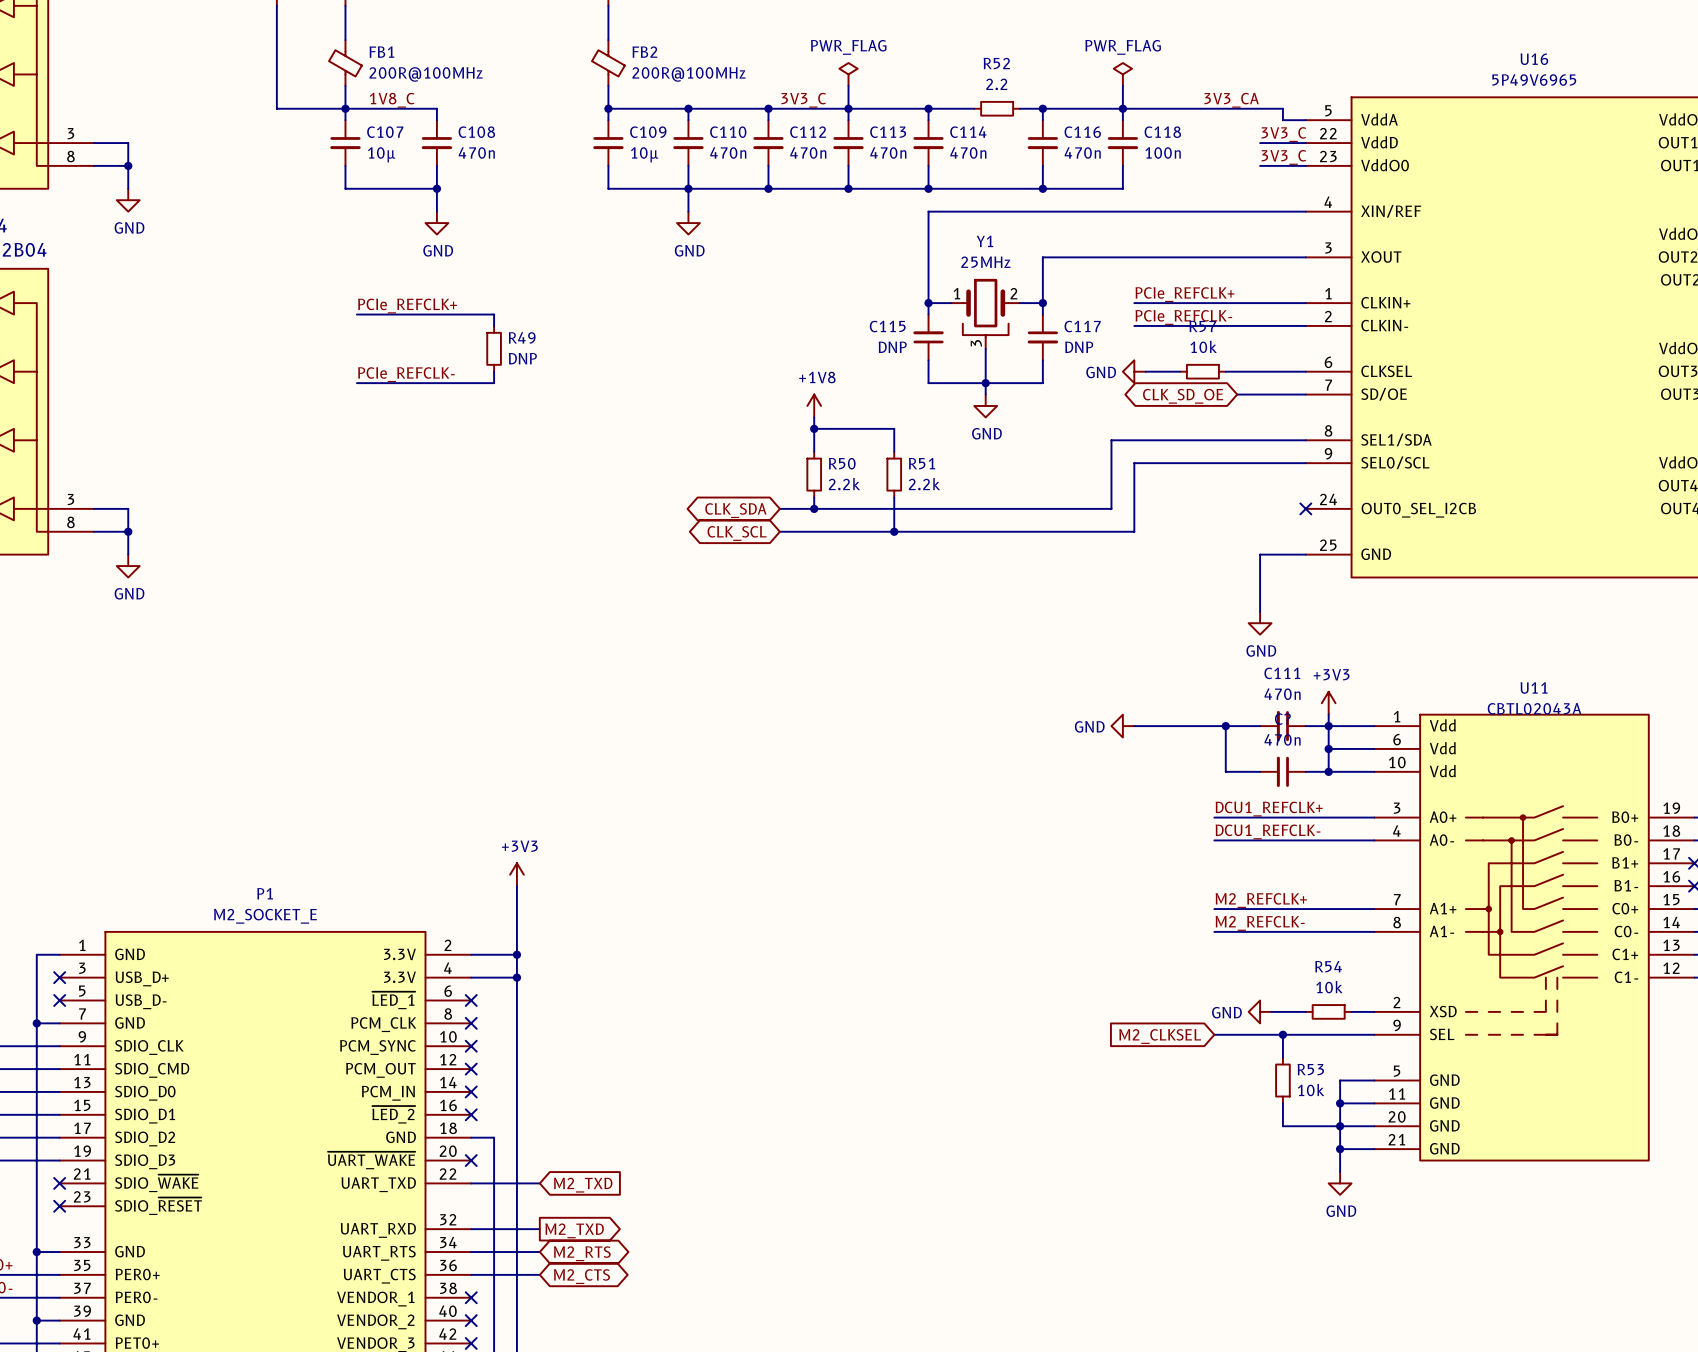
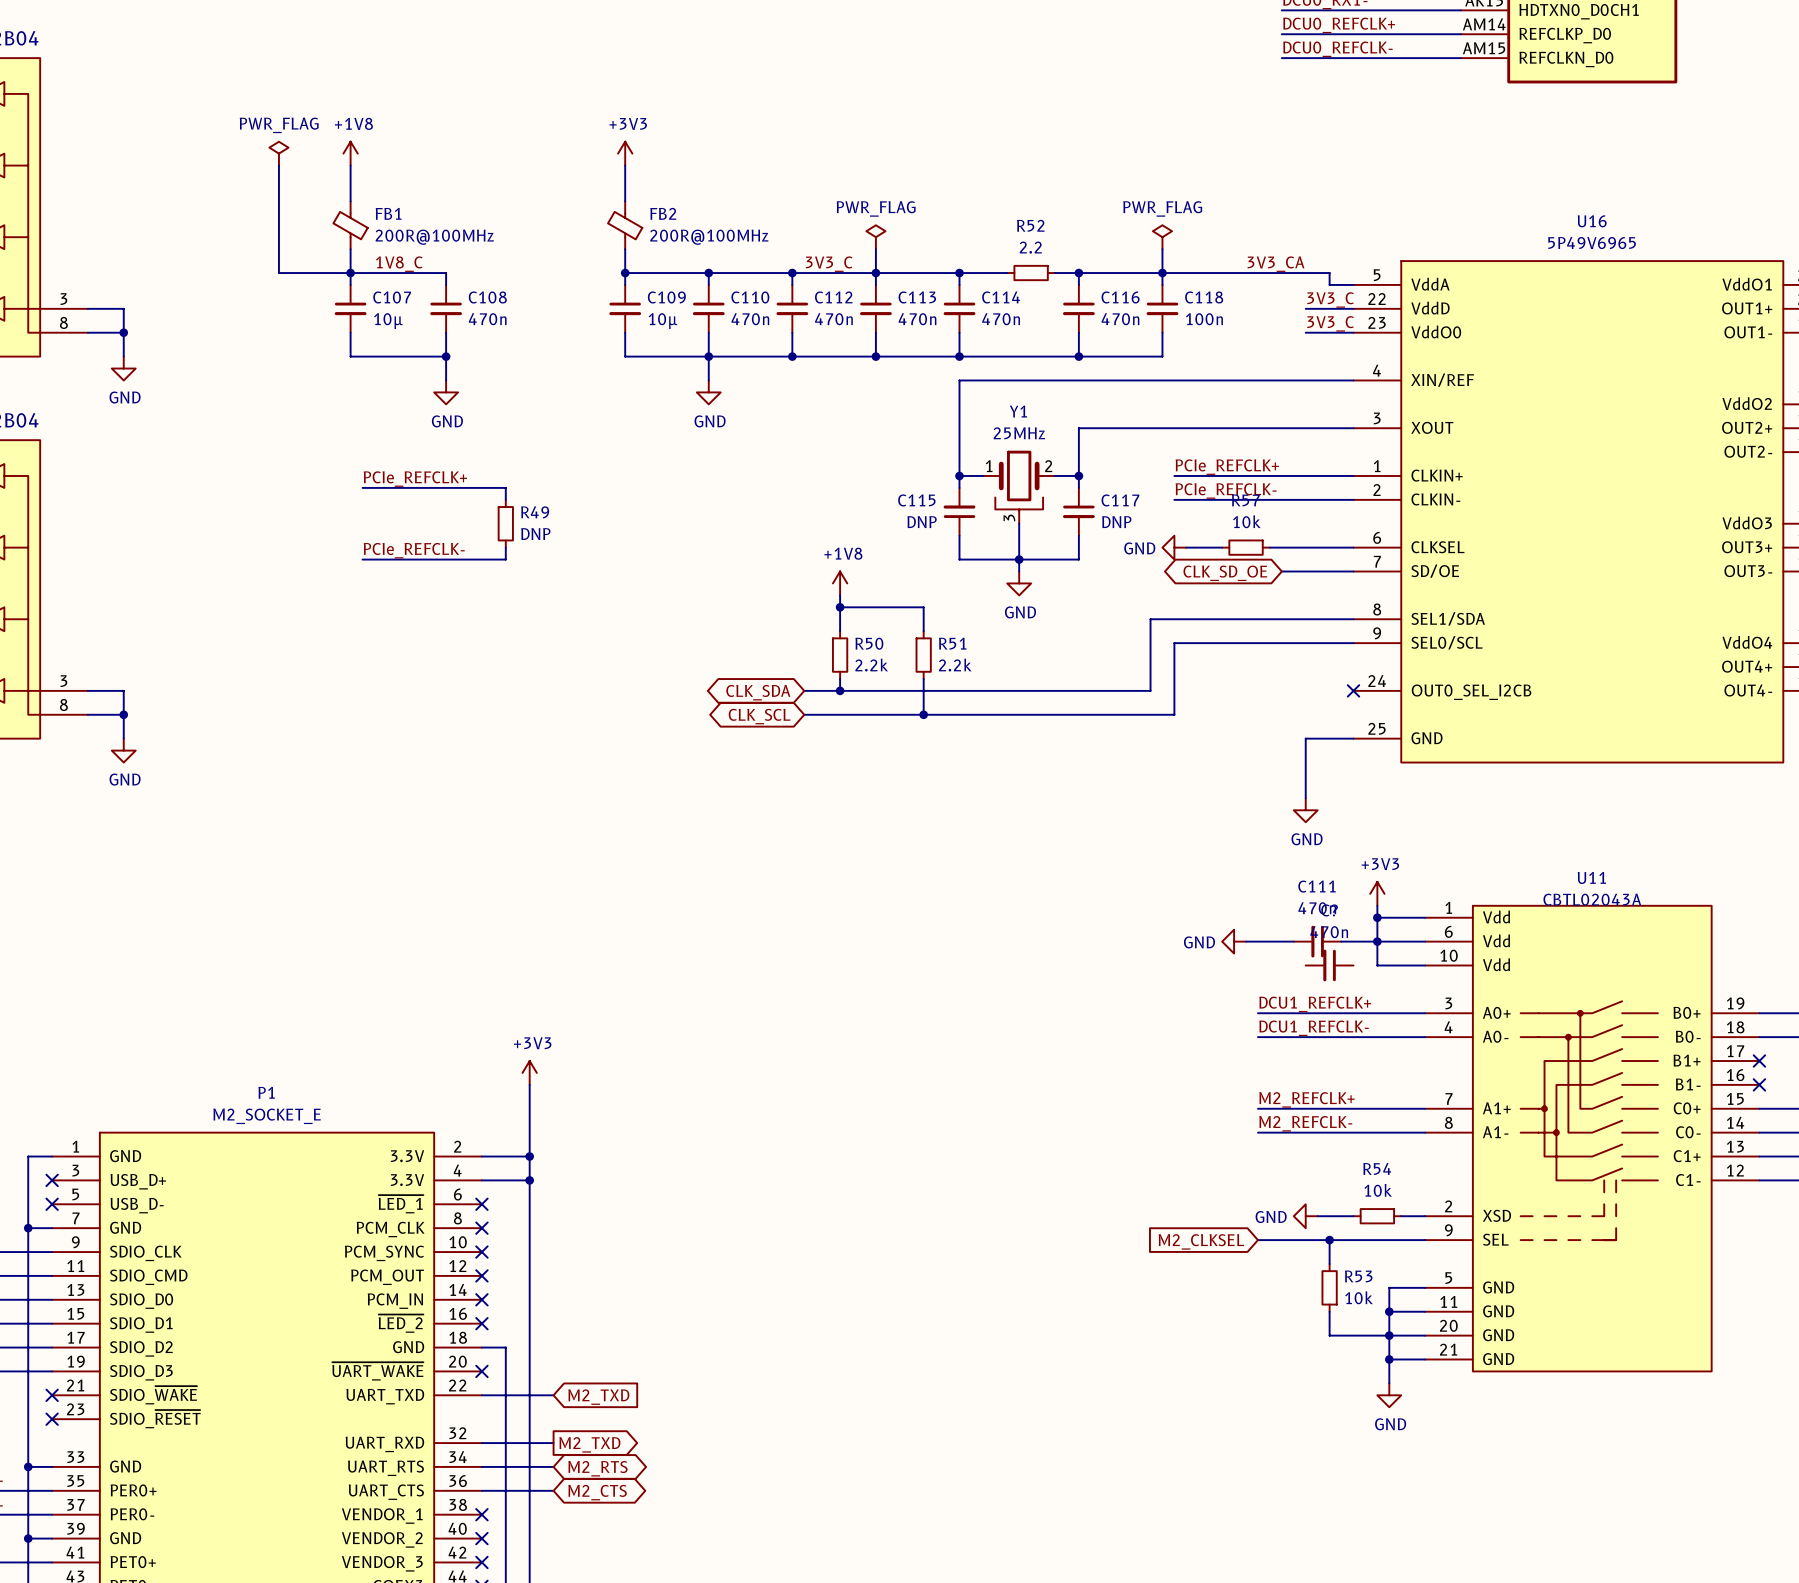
power symbol position: GND (1122, 726) -> GND (1234, 941)
wire: (1134, 726) (1260, 726) -> none
wire: (1225, 726) (1225, 771) (1260, 771) -> none
junction: (1225, 726) -> none
C111 position: (1282, 726) -> (1317, 941)
wire: (1305, 726) (1328, 726) -> none
wire: none -> (1246, 941) (1293, 941)
wire: none -> (1341, 941) (1377, 941)
wire: (1305, 771) (1328, 771) -> none
junction: (1328, 771) -> none

